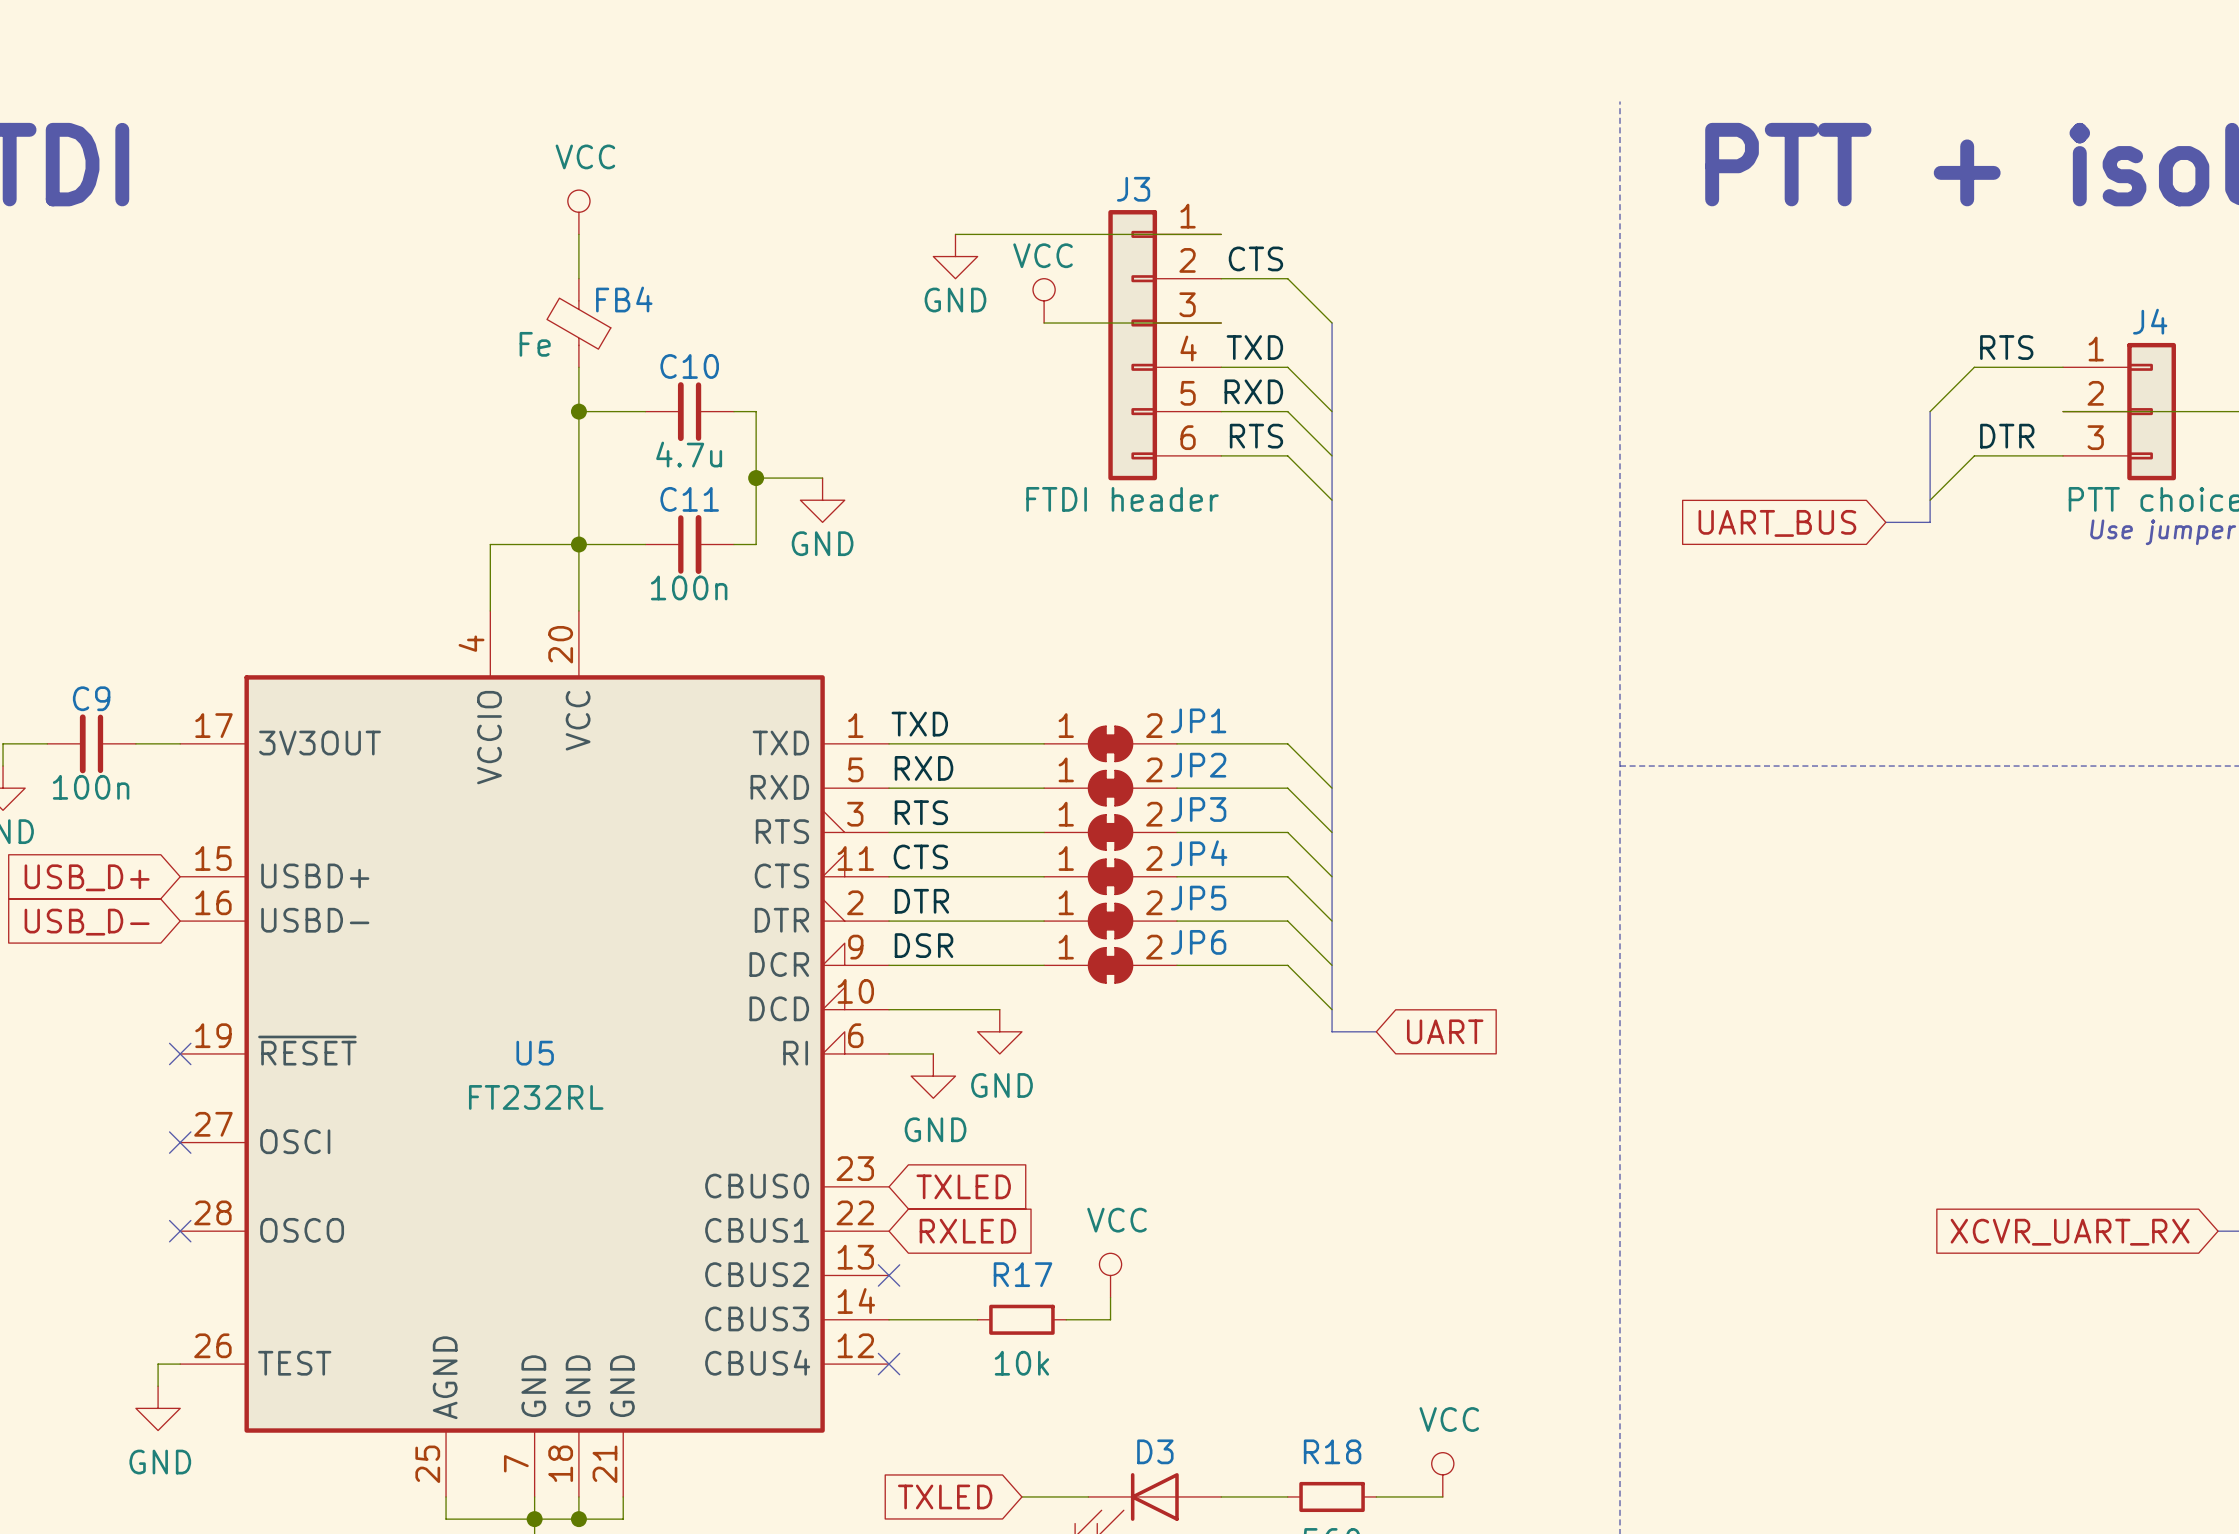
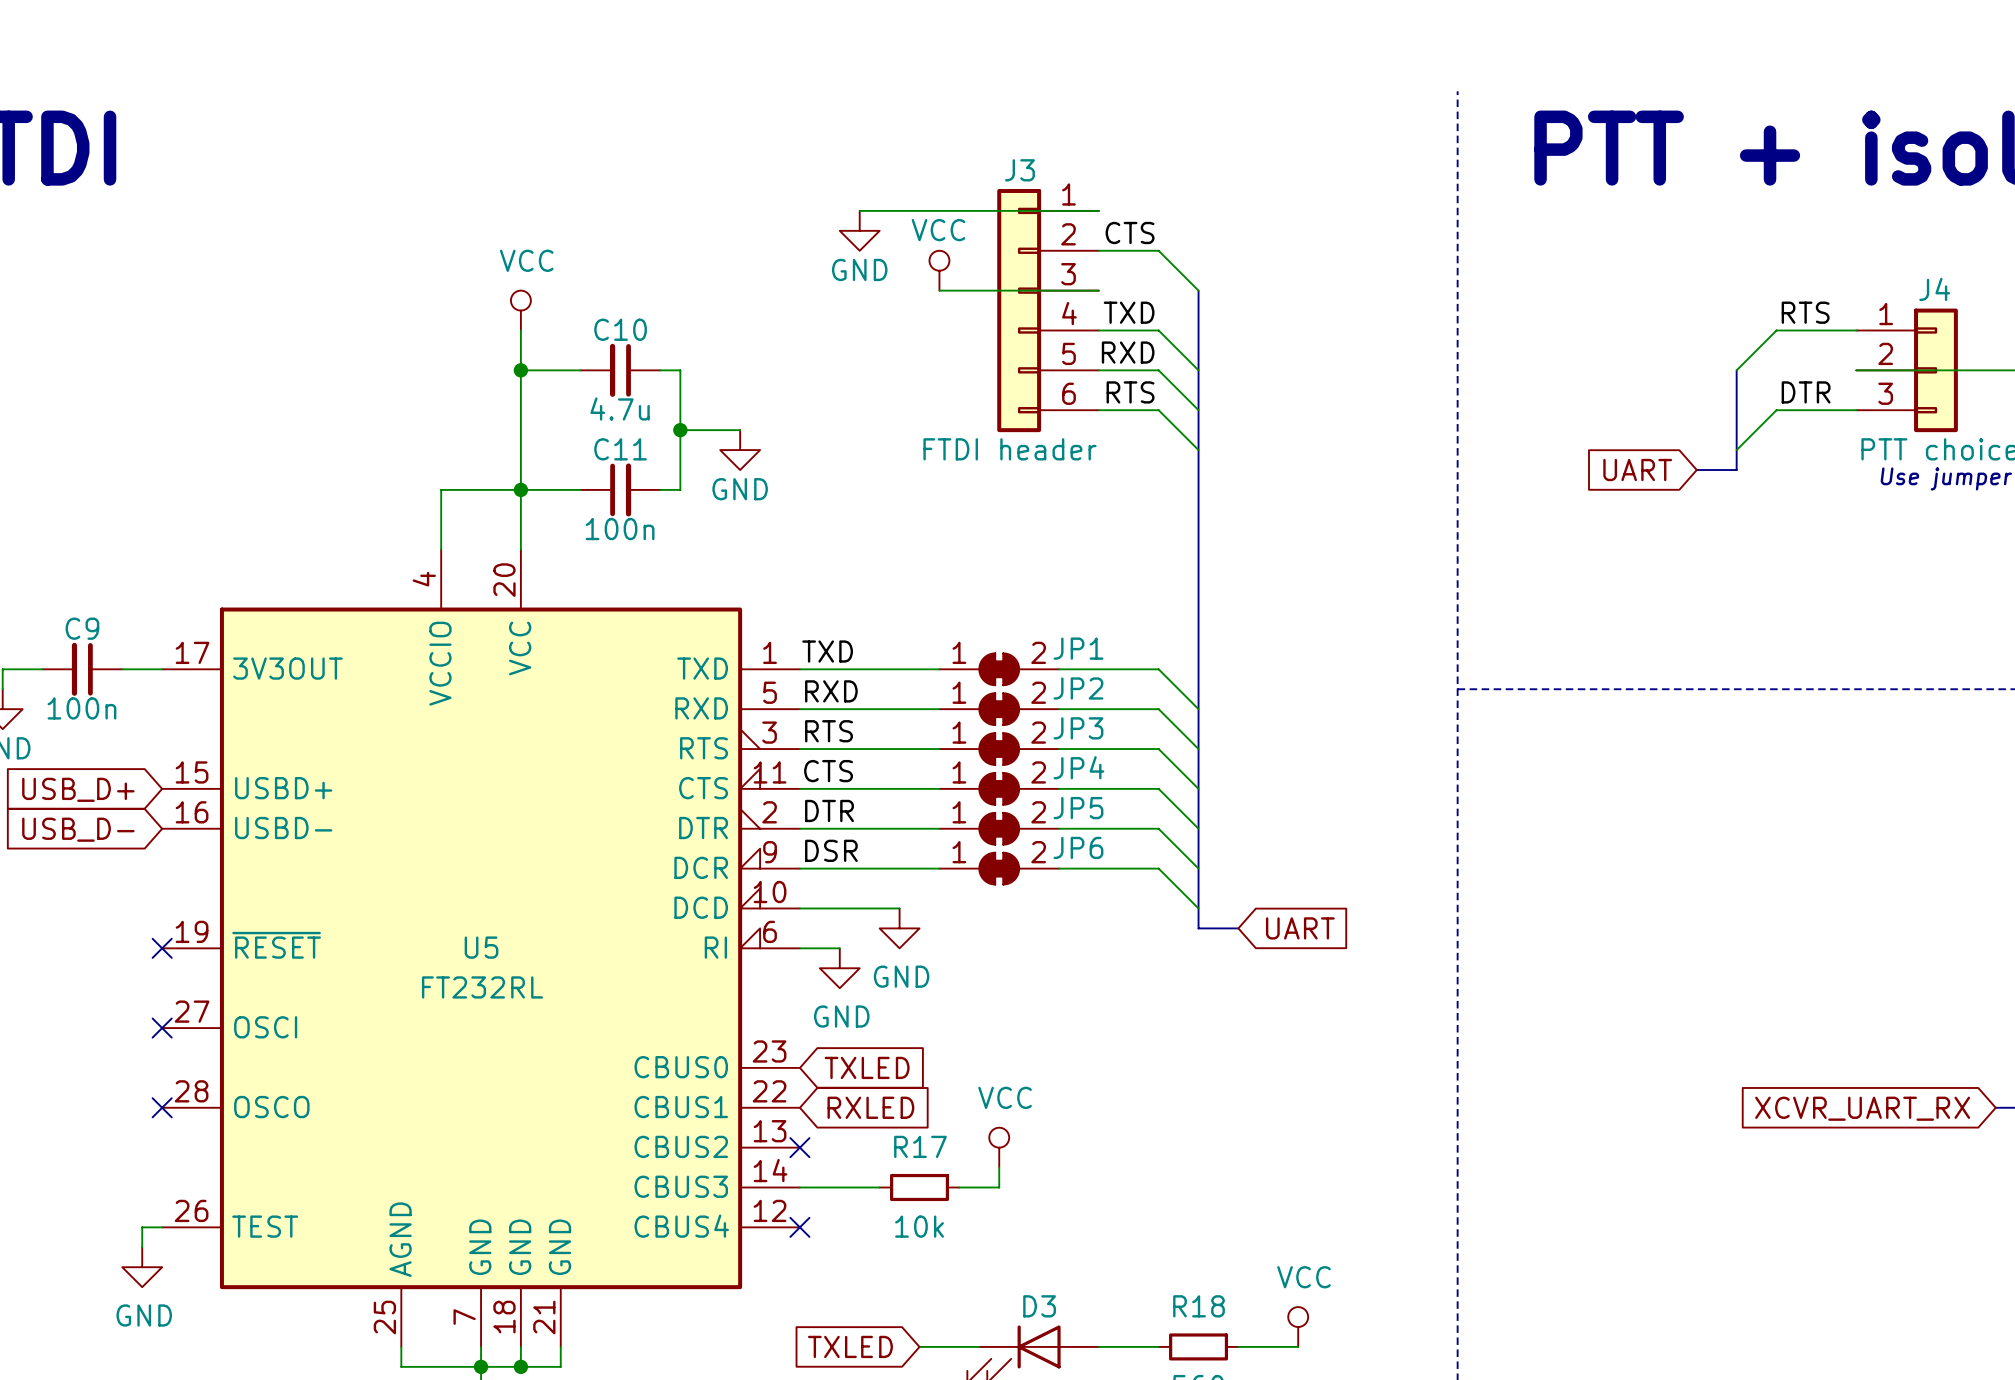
power symbol position: VCC (578, 212) -> VCC (520, 310)
wire: (578, 234) (578, 278) -> none
FB4: Fe (578, 323) -> none
global label: UART_BUS (1777, 523) -> UART (1637, 470)

